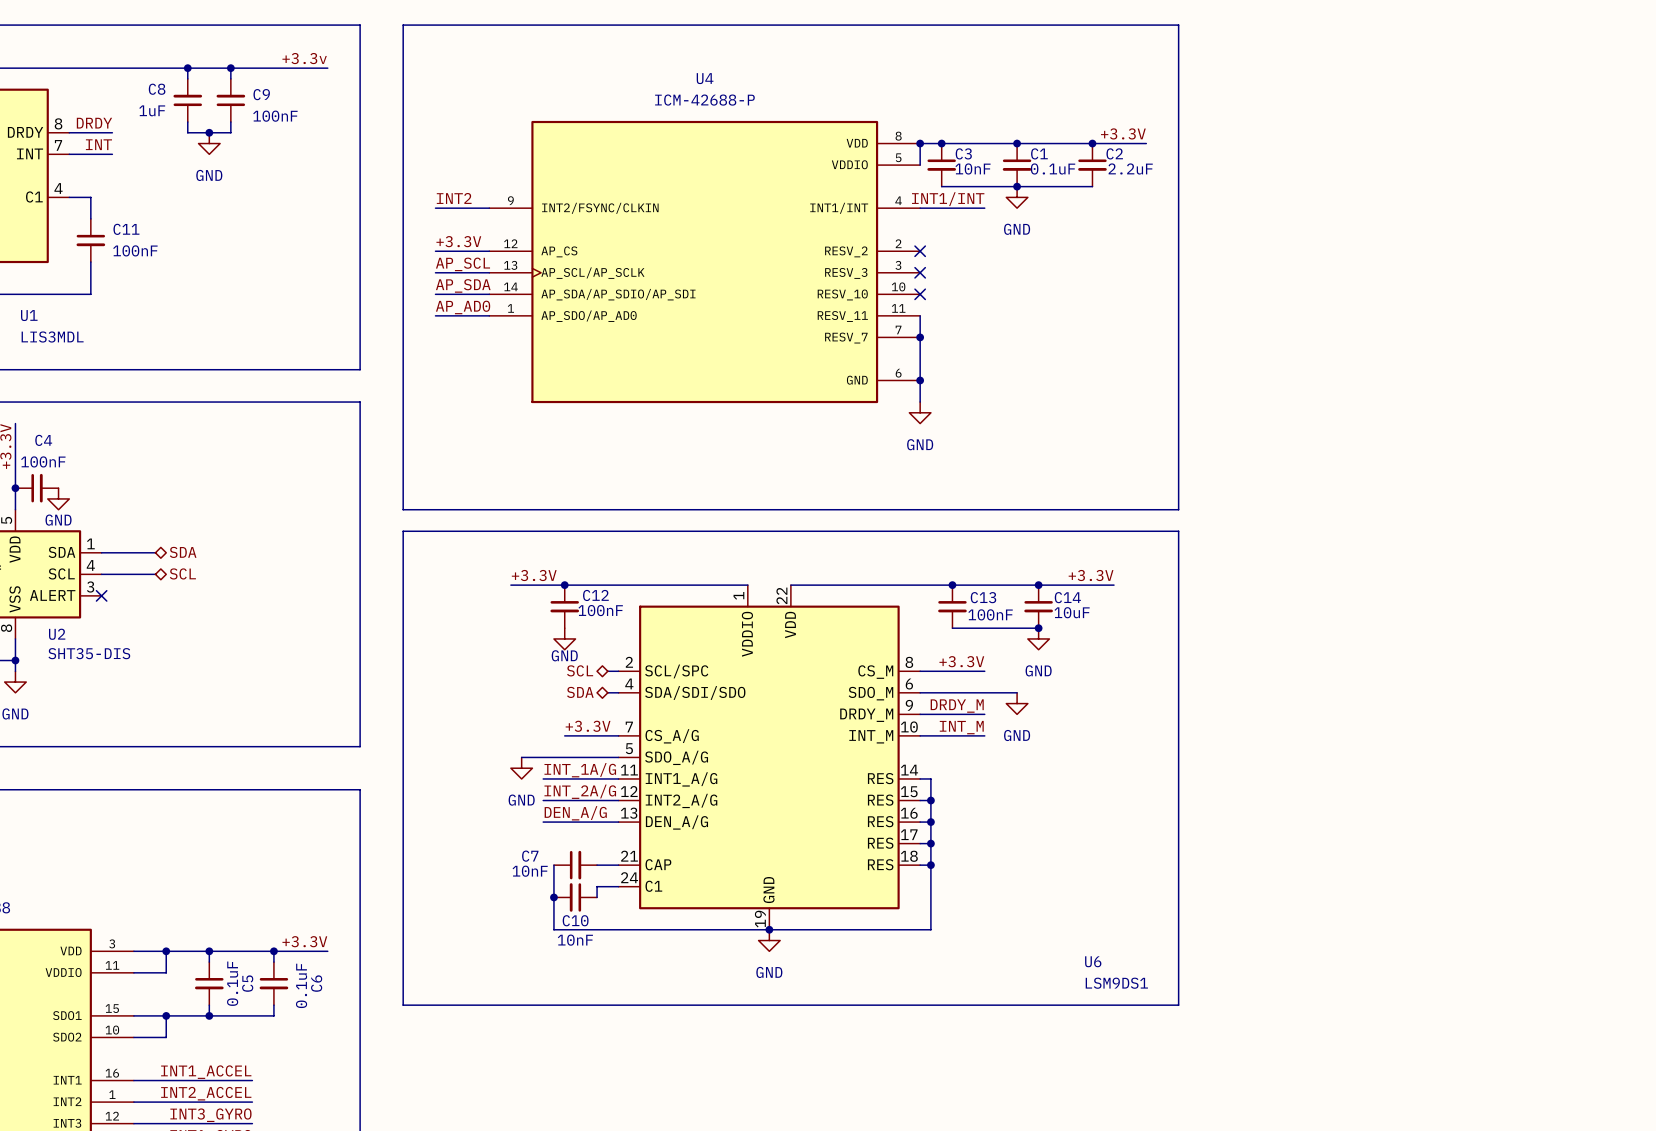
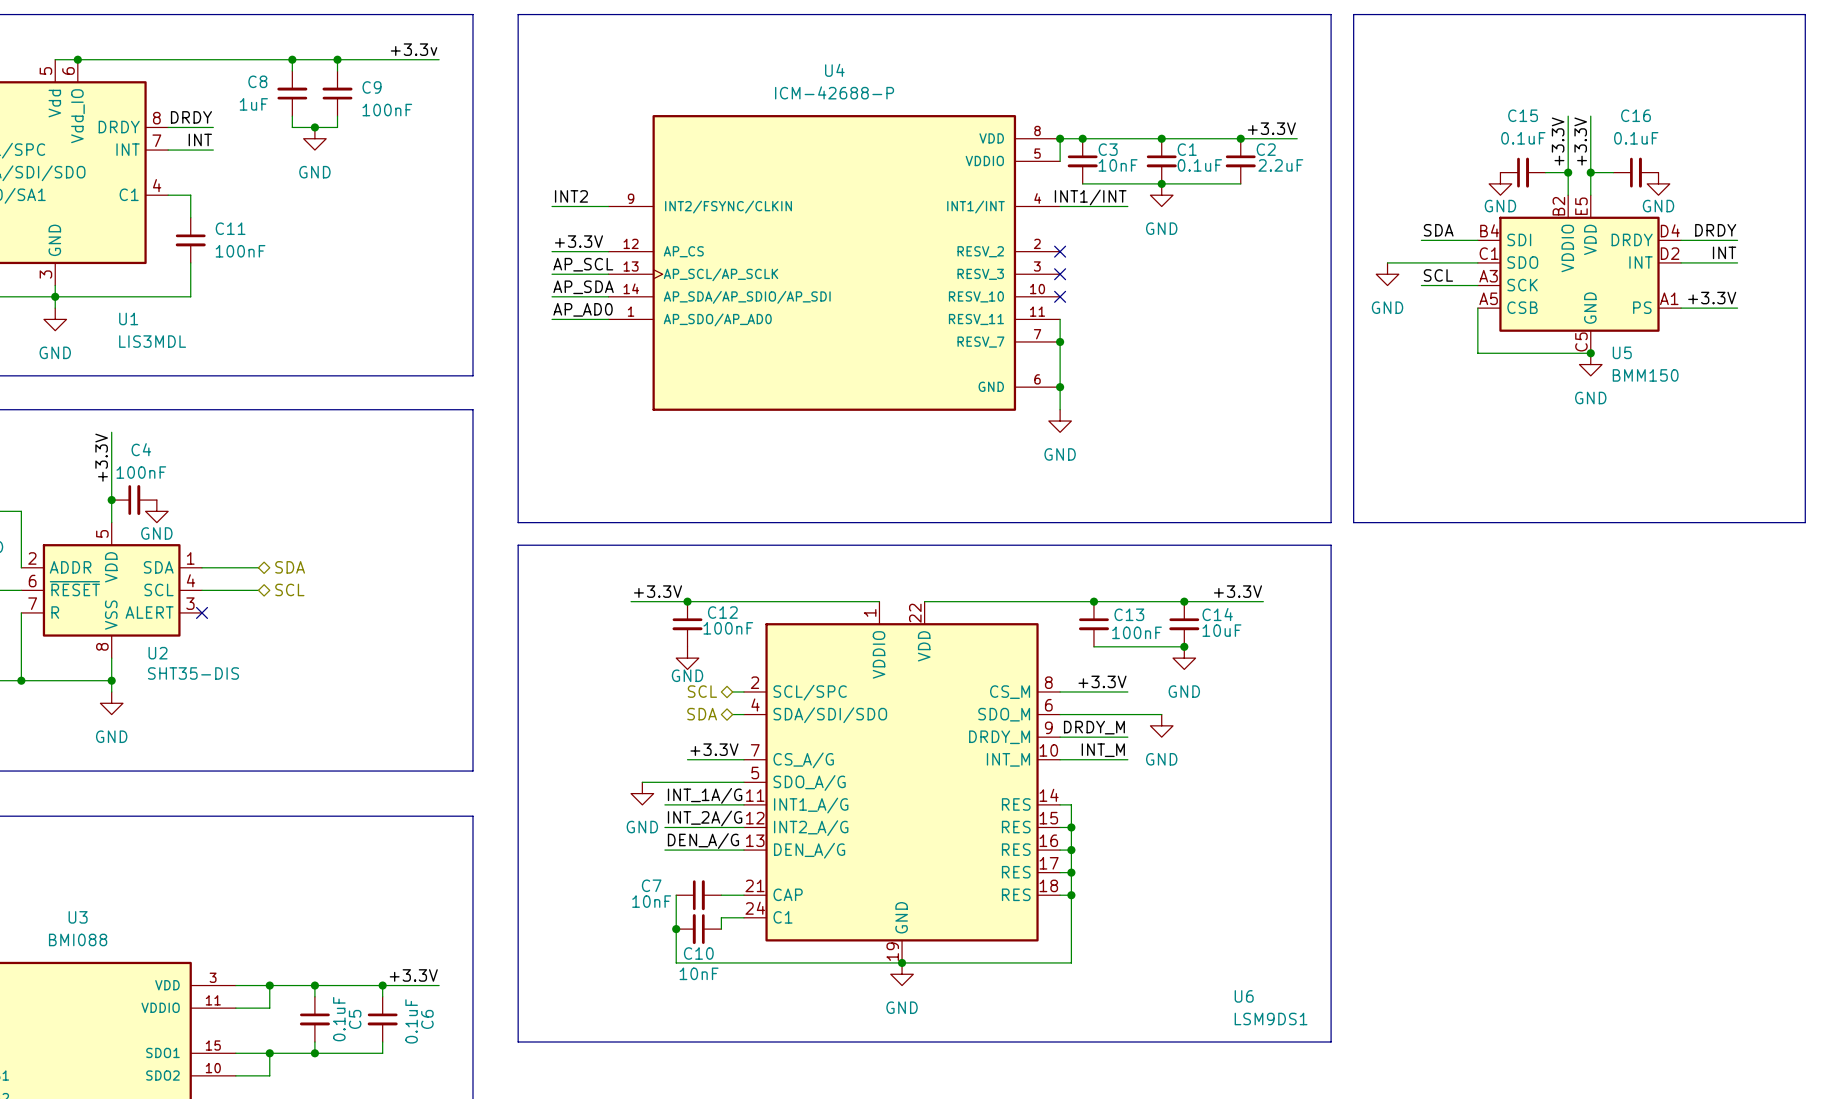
line: none -> (1353, 14) (1805, 14) (1805, 522) (1353, 522) (1353, 14)
wire: none -> (1568, 116) (1568, 195)
wire: none -> (1590, 116) (1590, 195)
label: none -> +3.3V (1558, 141)
label: none -> +3.3V (1580, 141)
C15: none -> 0.1uF (1523, 172)
wire: none -> (1545, 172) (1568, 172)
junction: none -> (1568, 172)
wire: none -> (1590, 172) (1613, 172)
junction: none -> (1590, 172)
C16: none -> 0.1uF (1635, 172)
power symbol: none -> GND (1500, 183)
power symbol: none -> GND (1658, 183)
label: none -> SDA (1438, 230)
label: none -> DRDY (1715, 230)
wire: none -> (1421, 240) (1477, 240)
wire: none -> (1681, 240) (1737, 240)
label: none -> INT (1724, 252)
wire: none -> (1387, 262) (1477, 262)
wire: none -> (1681, 262) (1737, 262)
power symbol: none -> GND (1387, 274)
U5: none -> BMM150 (1579, 274)
label: none -> SCL (1438, 275)
wire: none -> (1421, 285) (1477, 285)
label: none -> +3.3V (1712, 298)
wire: none -> (1477, 308) (1477, 353) (1590, 353)
wire: none -> (1681, 308) (1737, 308)
junction: none -> (1590, 353)
power symbol: none -> GND (1590, 364)

